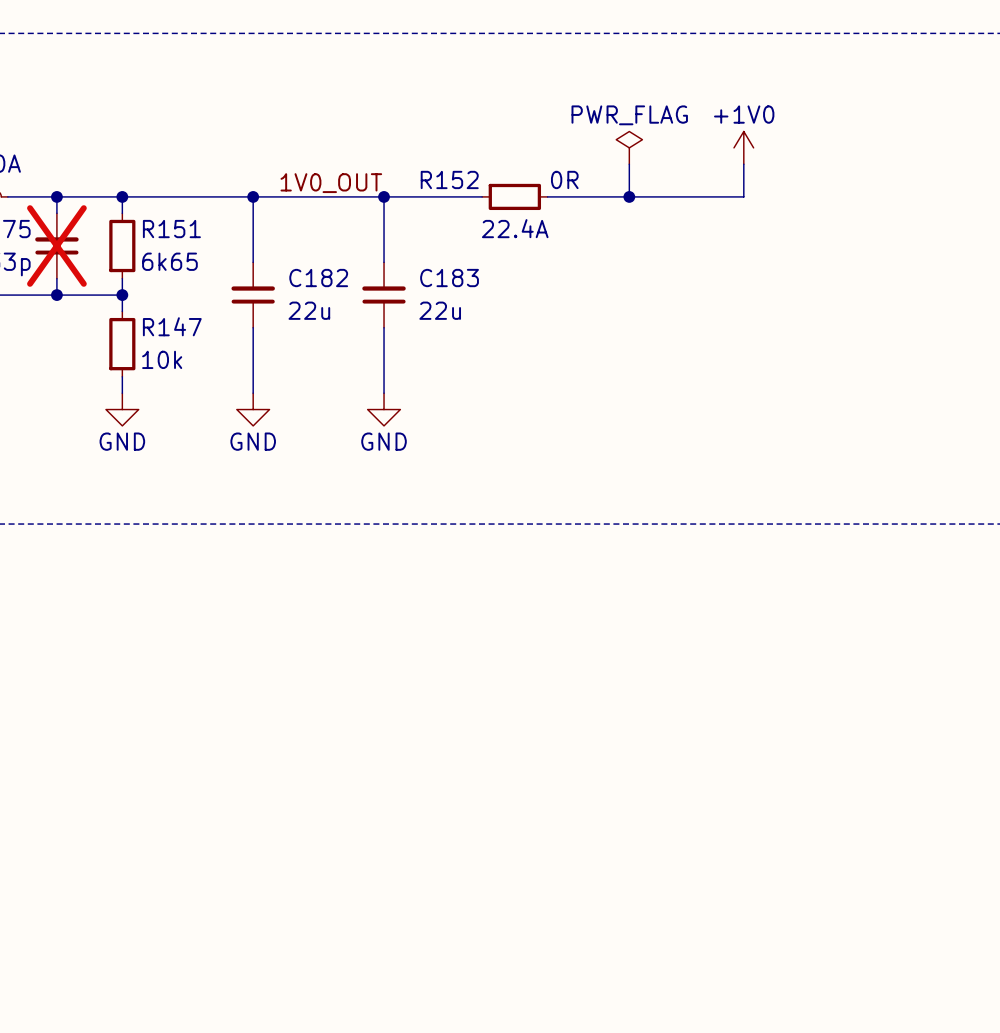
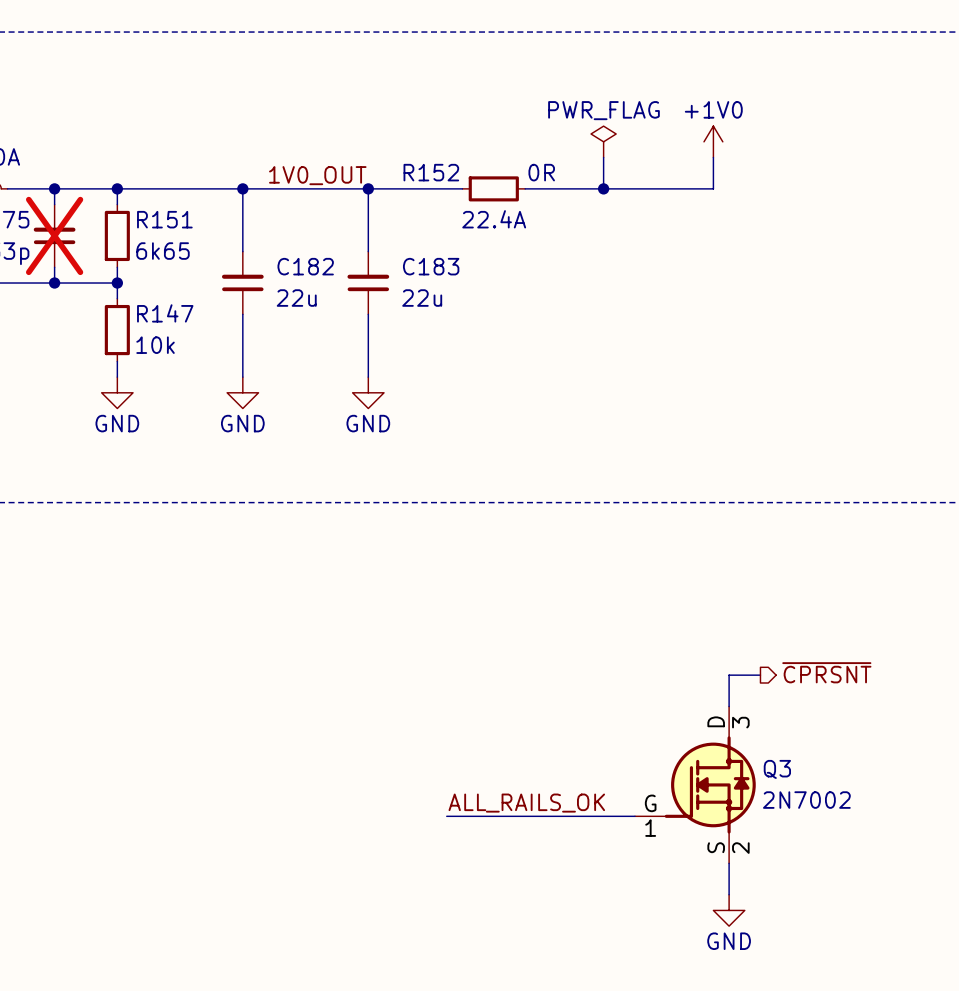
hierarchical label: none -> ~{CPRSNT} (826, 672)
wire: none -> (760, 675) (729, 675) (729, 706)
Q3: none -> (695, 784)
label: none -> ALL_RAILS_OK (526, 803)
wire: none -> (446, 816) (634, 816)
wire: none -> (729, 863) (729, 894)
power symbol: none -> GND (729, 910)

